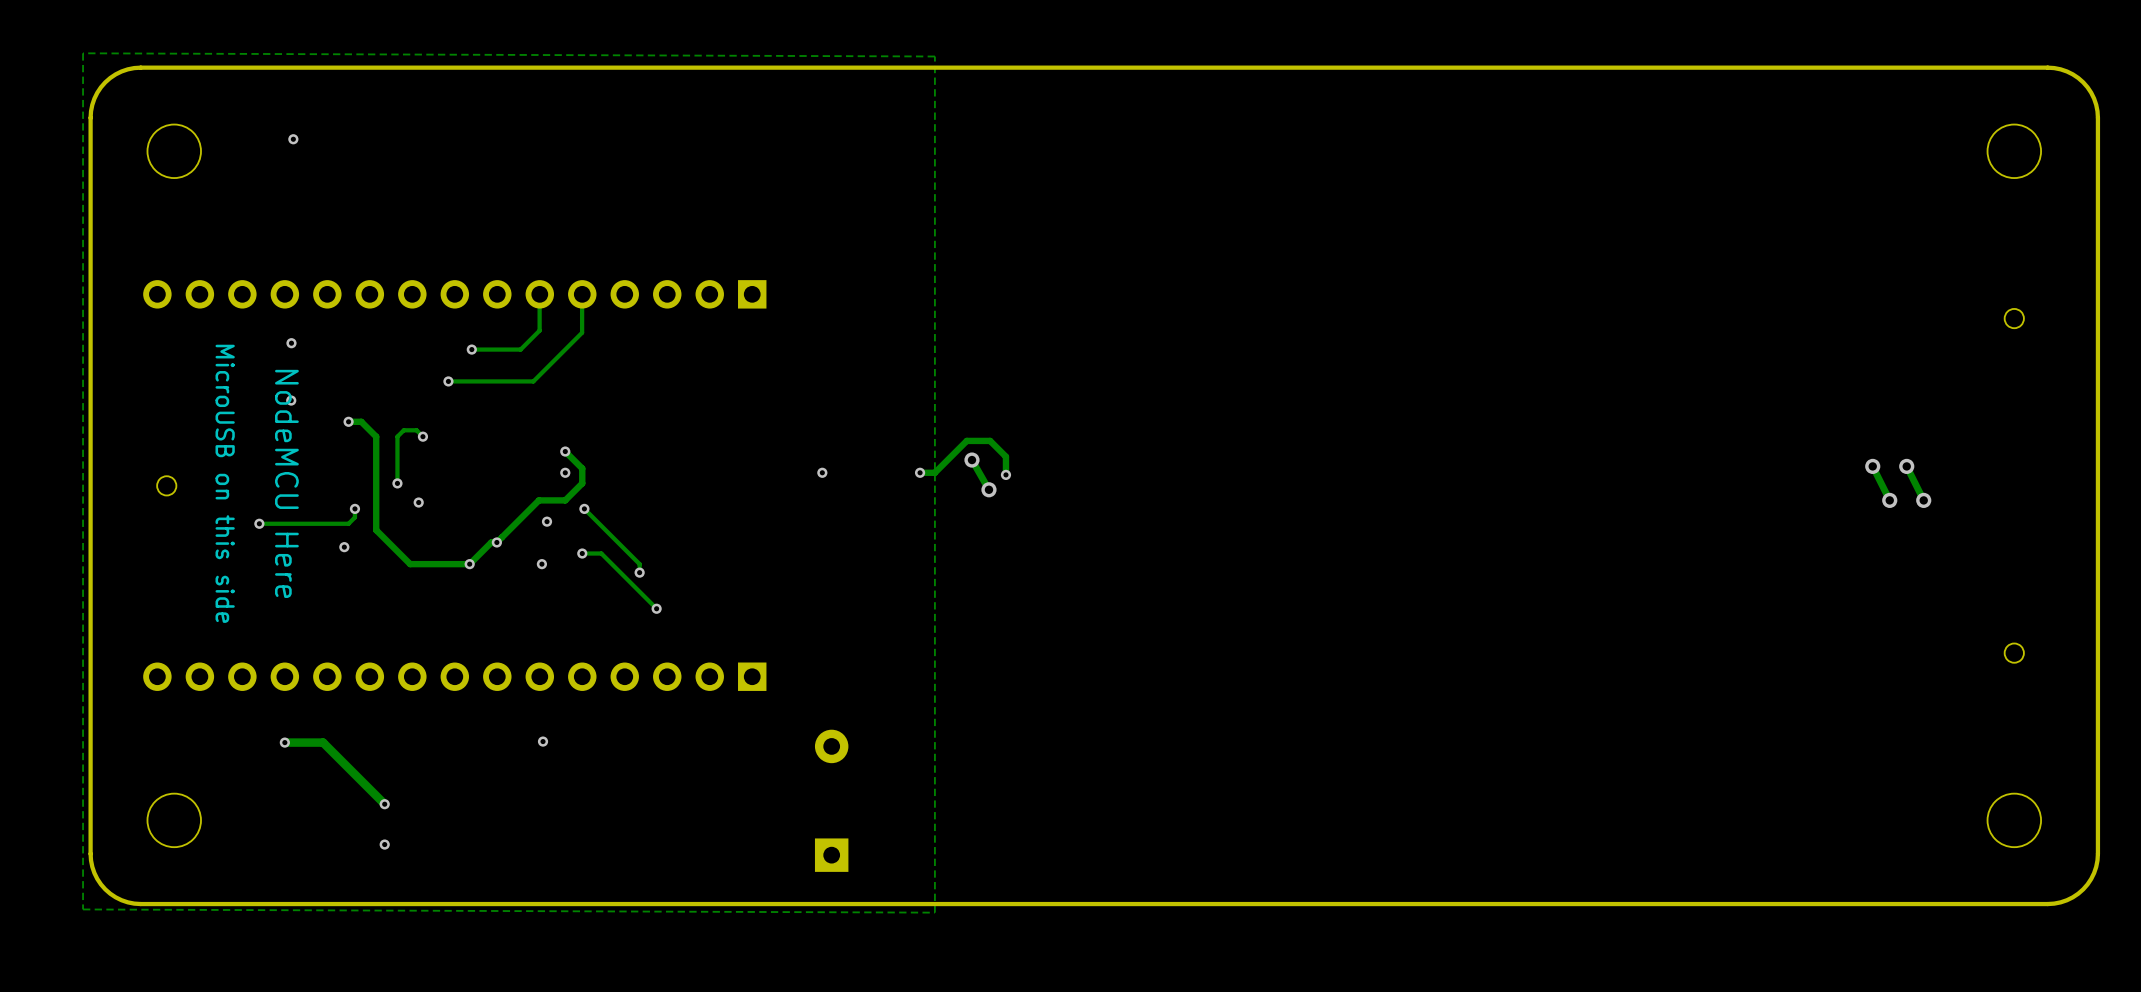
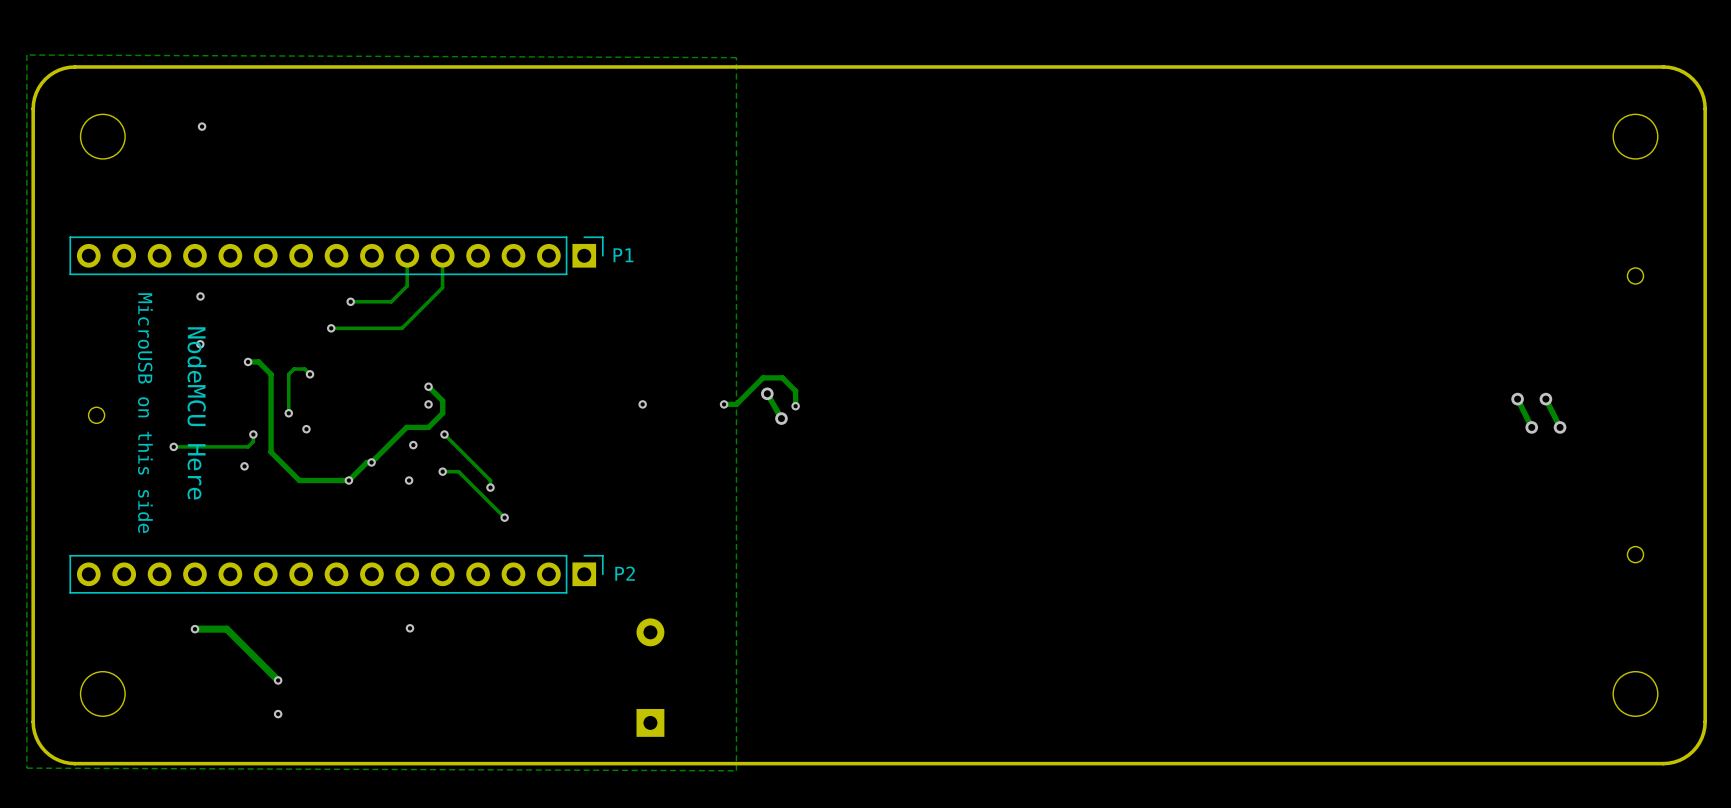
P1 side: top (454, 294) -> bottom (336, 255)
P2 side: top (454, 676) -> bottom (336, 574)

